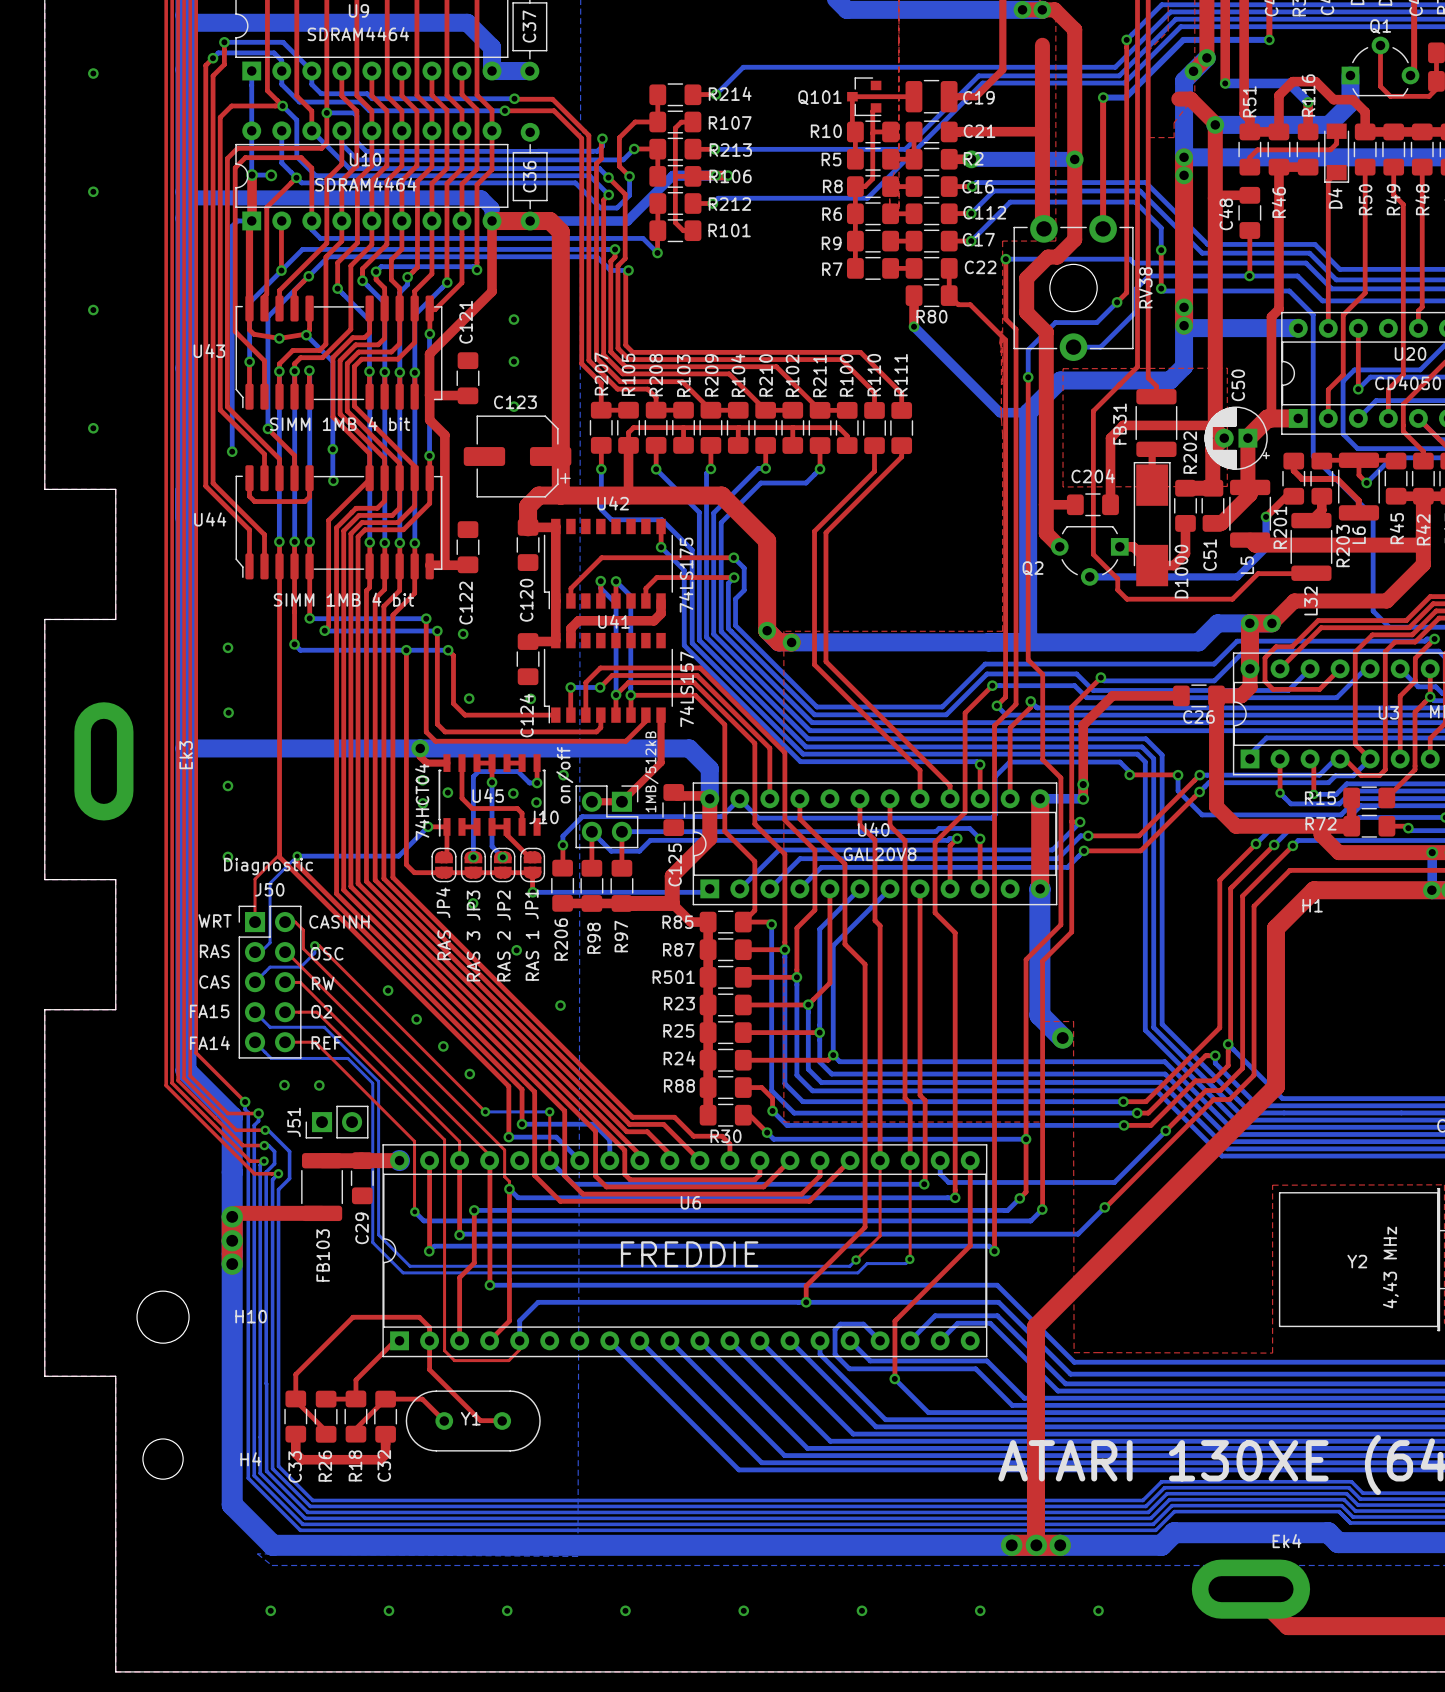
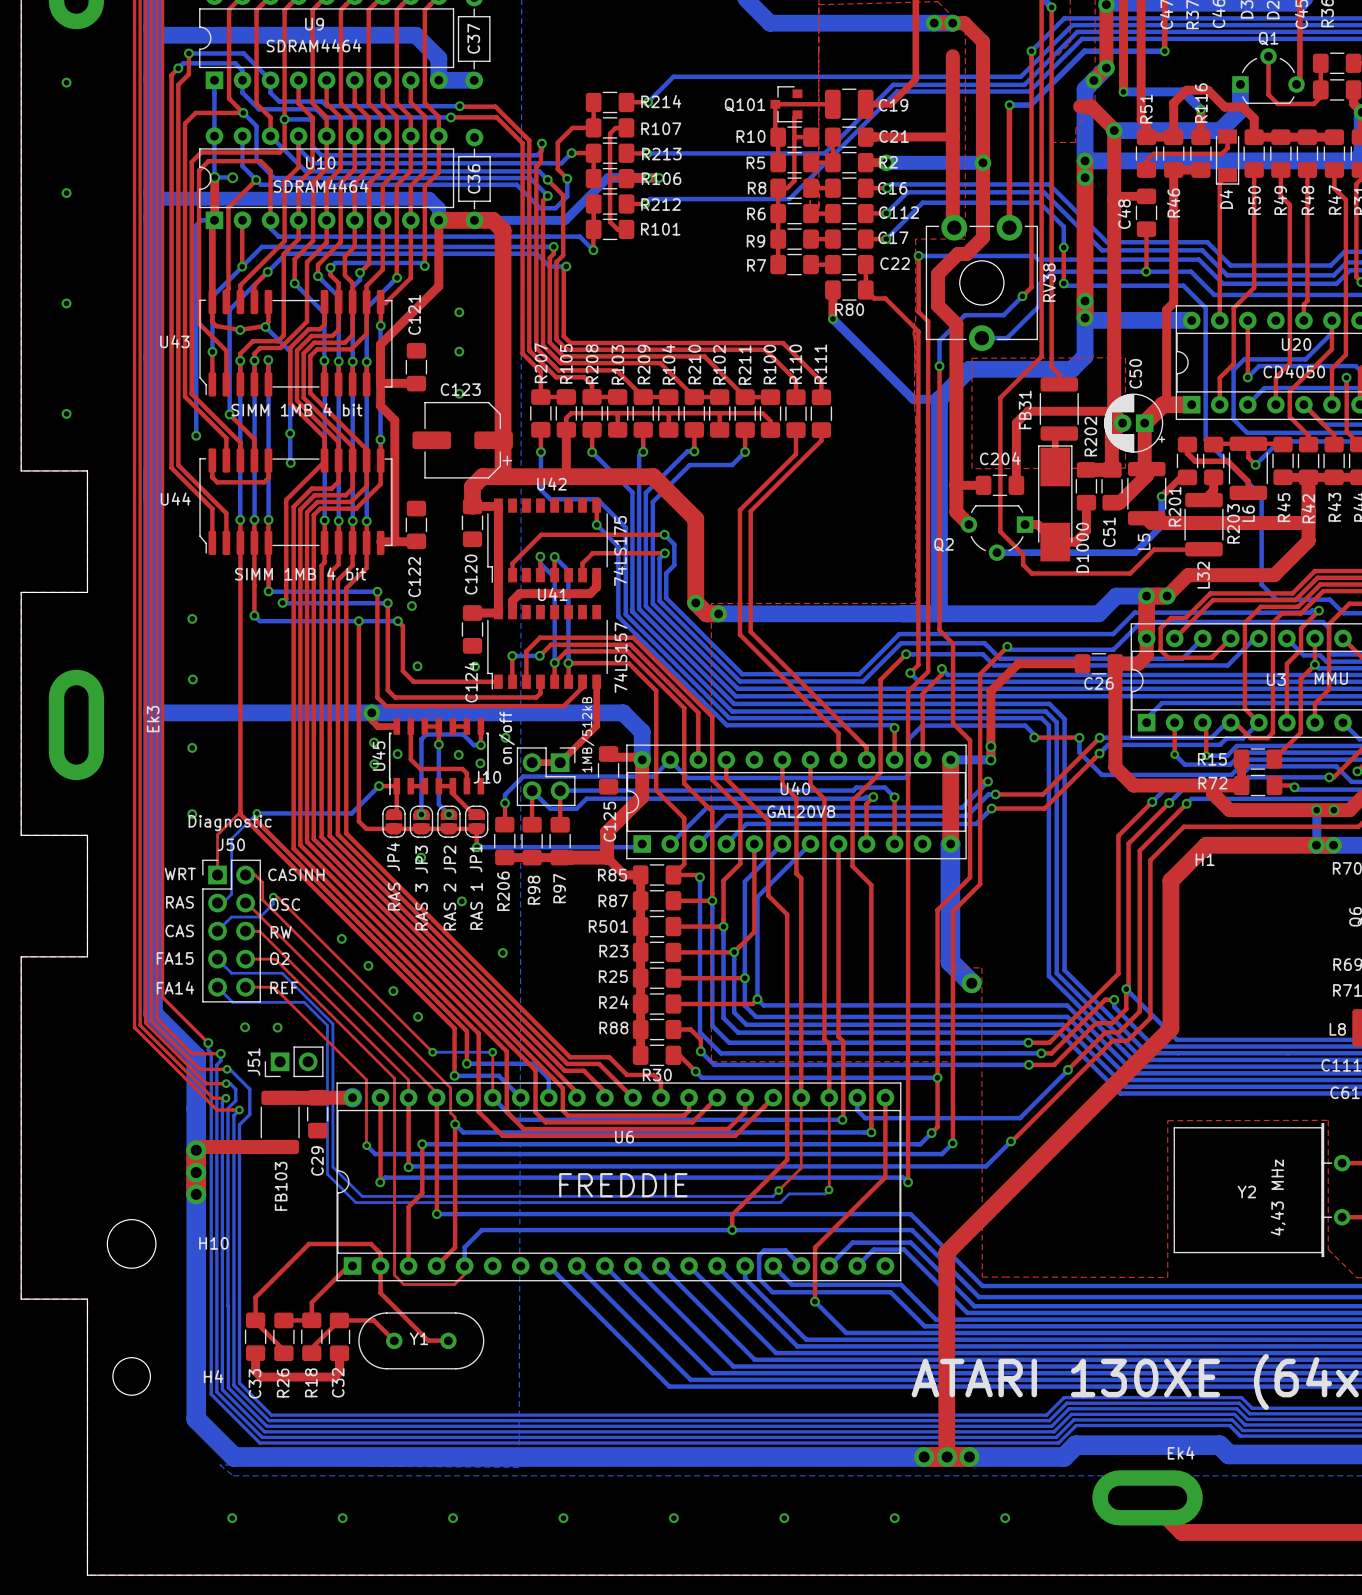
U45 name rotation: 0° (488, 795) -> 90° counterclockwise (378, 756)
U45 name position: U45 (488, 795) -> U45 (378, 756)
text: 74HCT04 (422, 802) -> none

